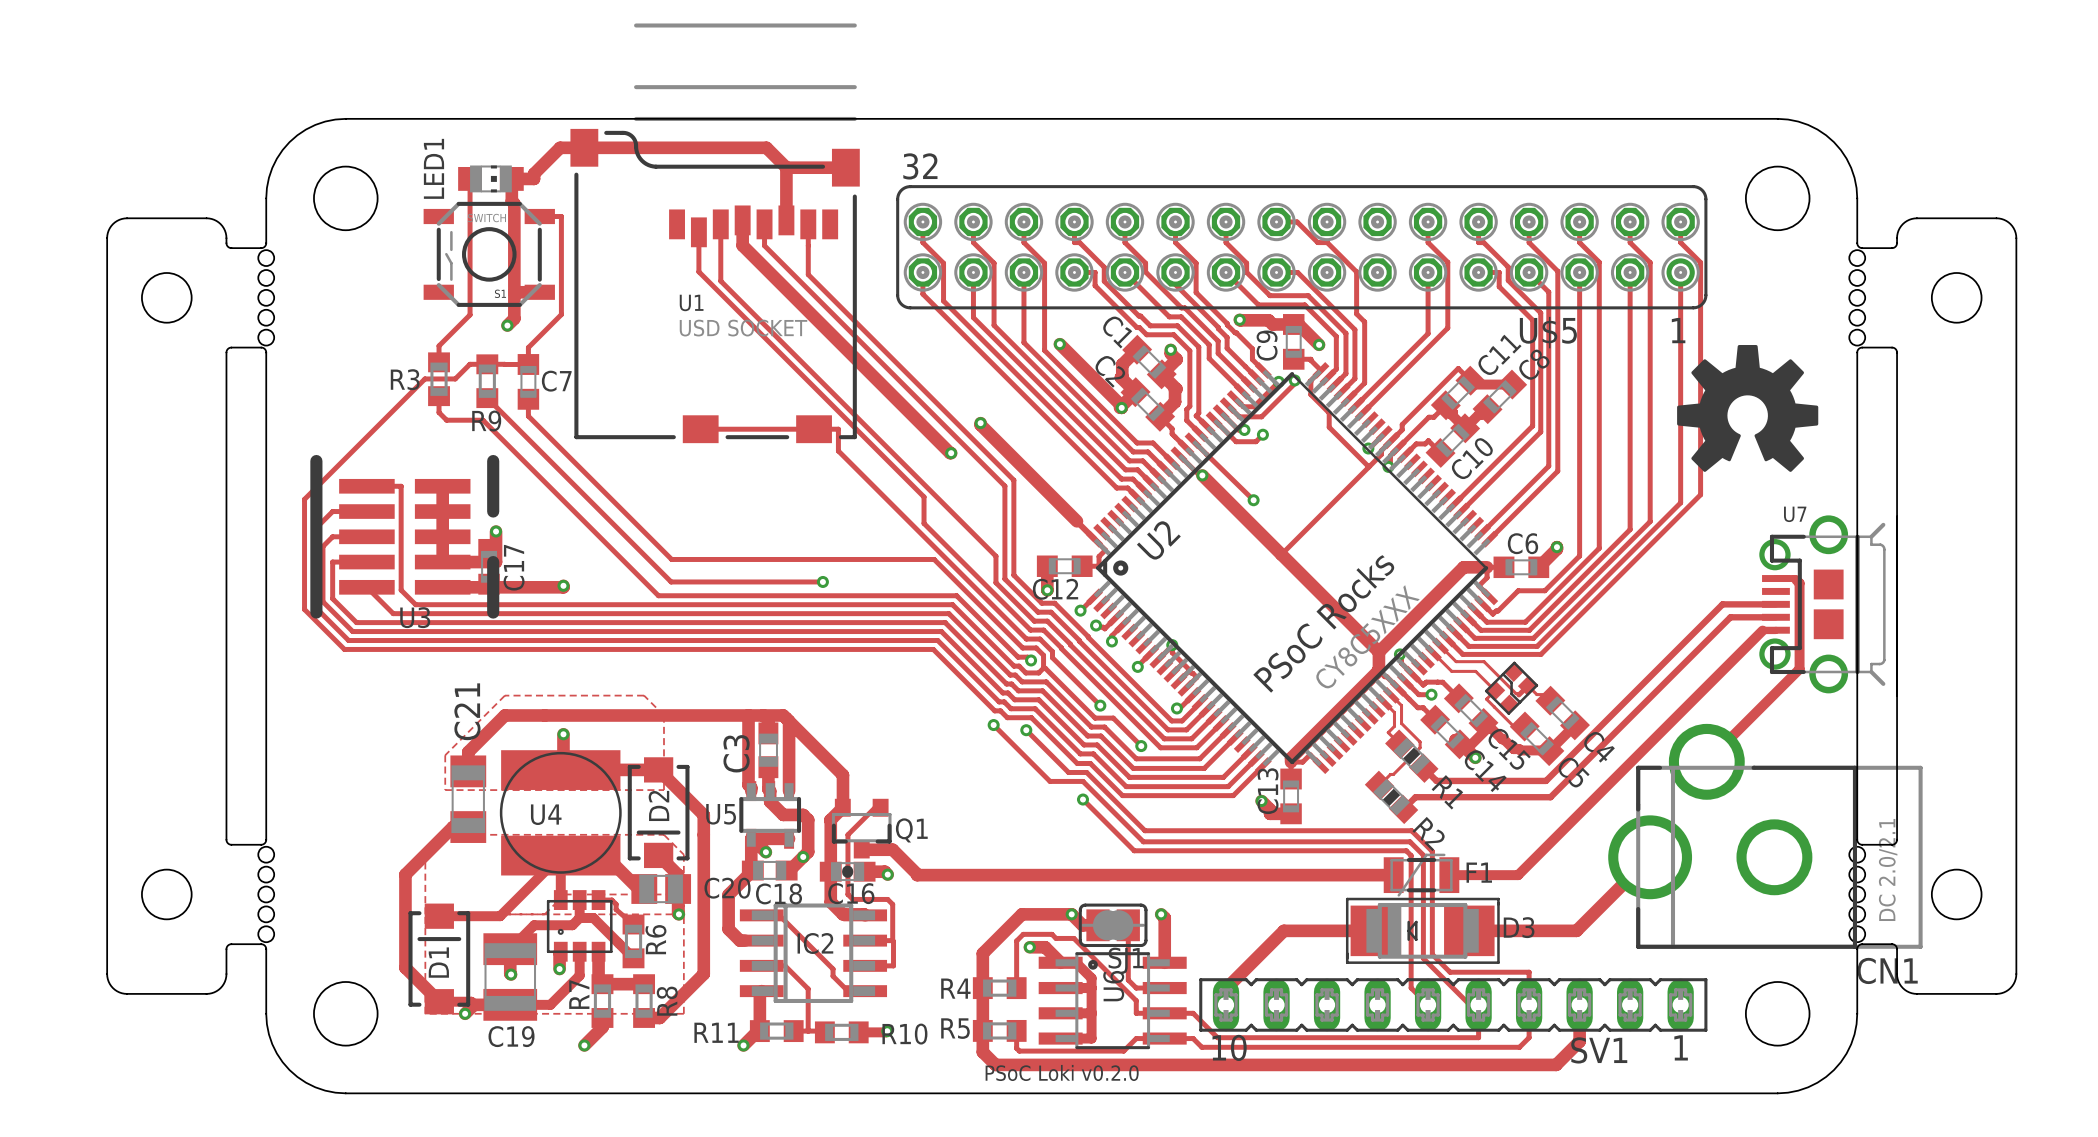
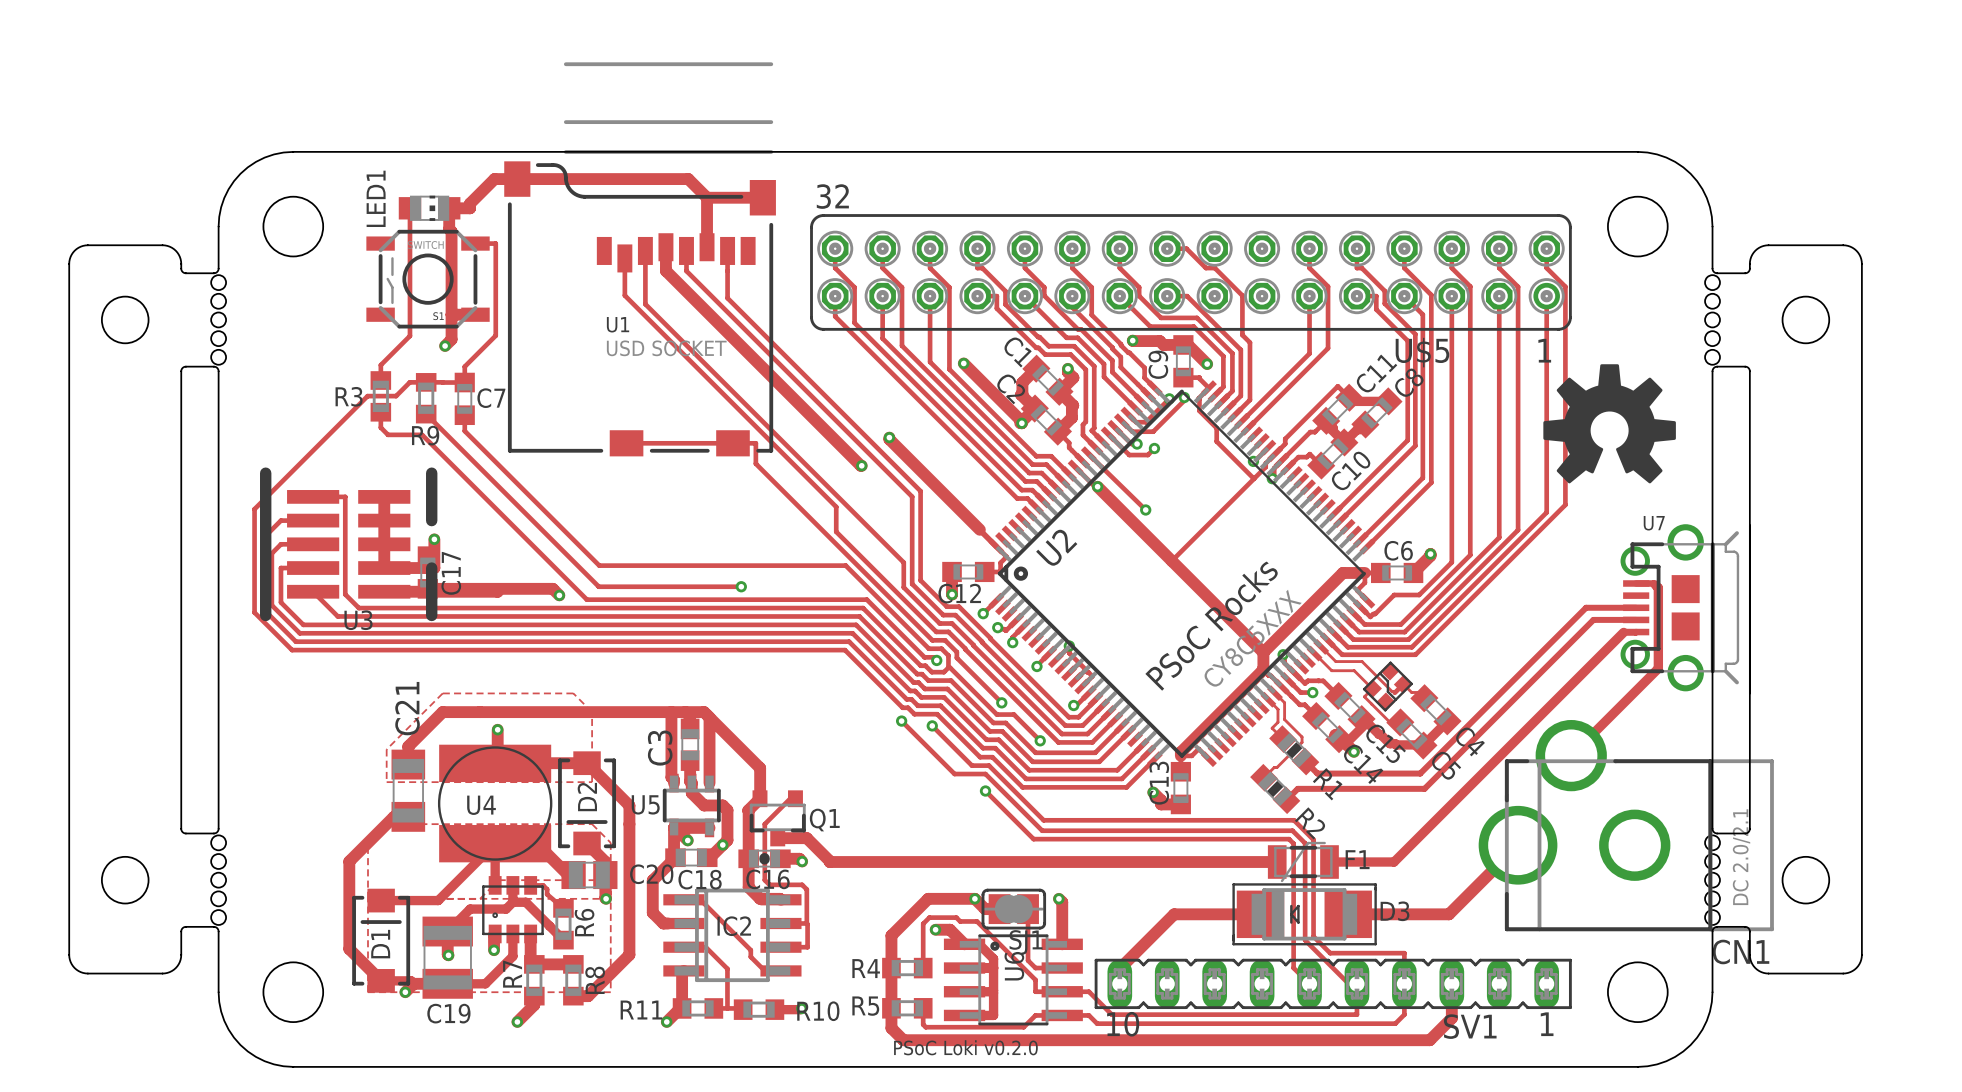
track: none -> (427, 588) (552, 588) (559, 595)
via position: (563, 585) -> (559, 595)

